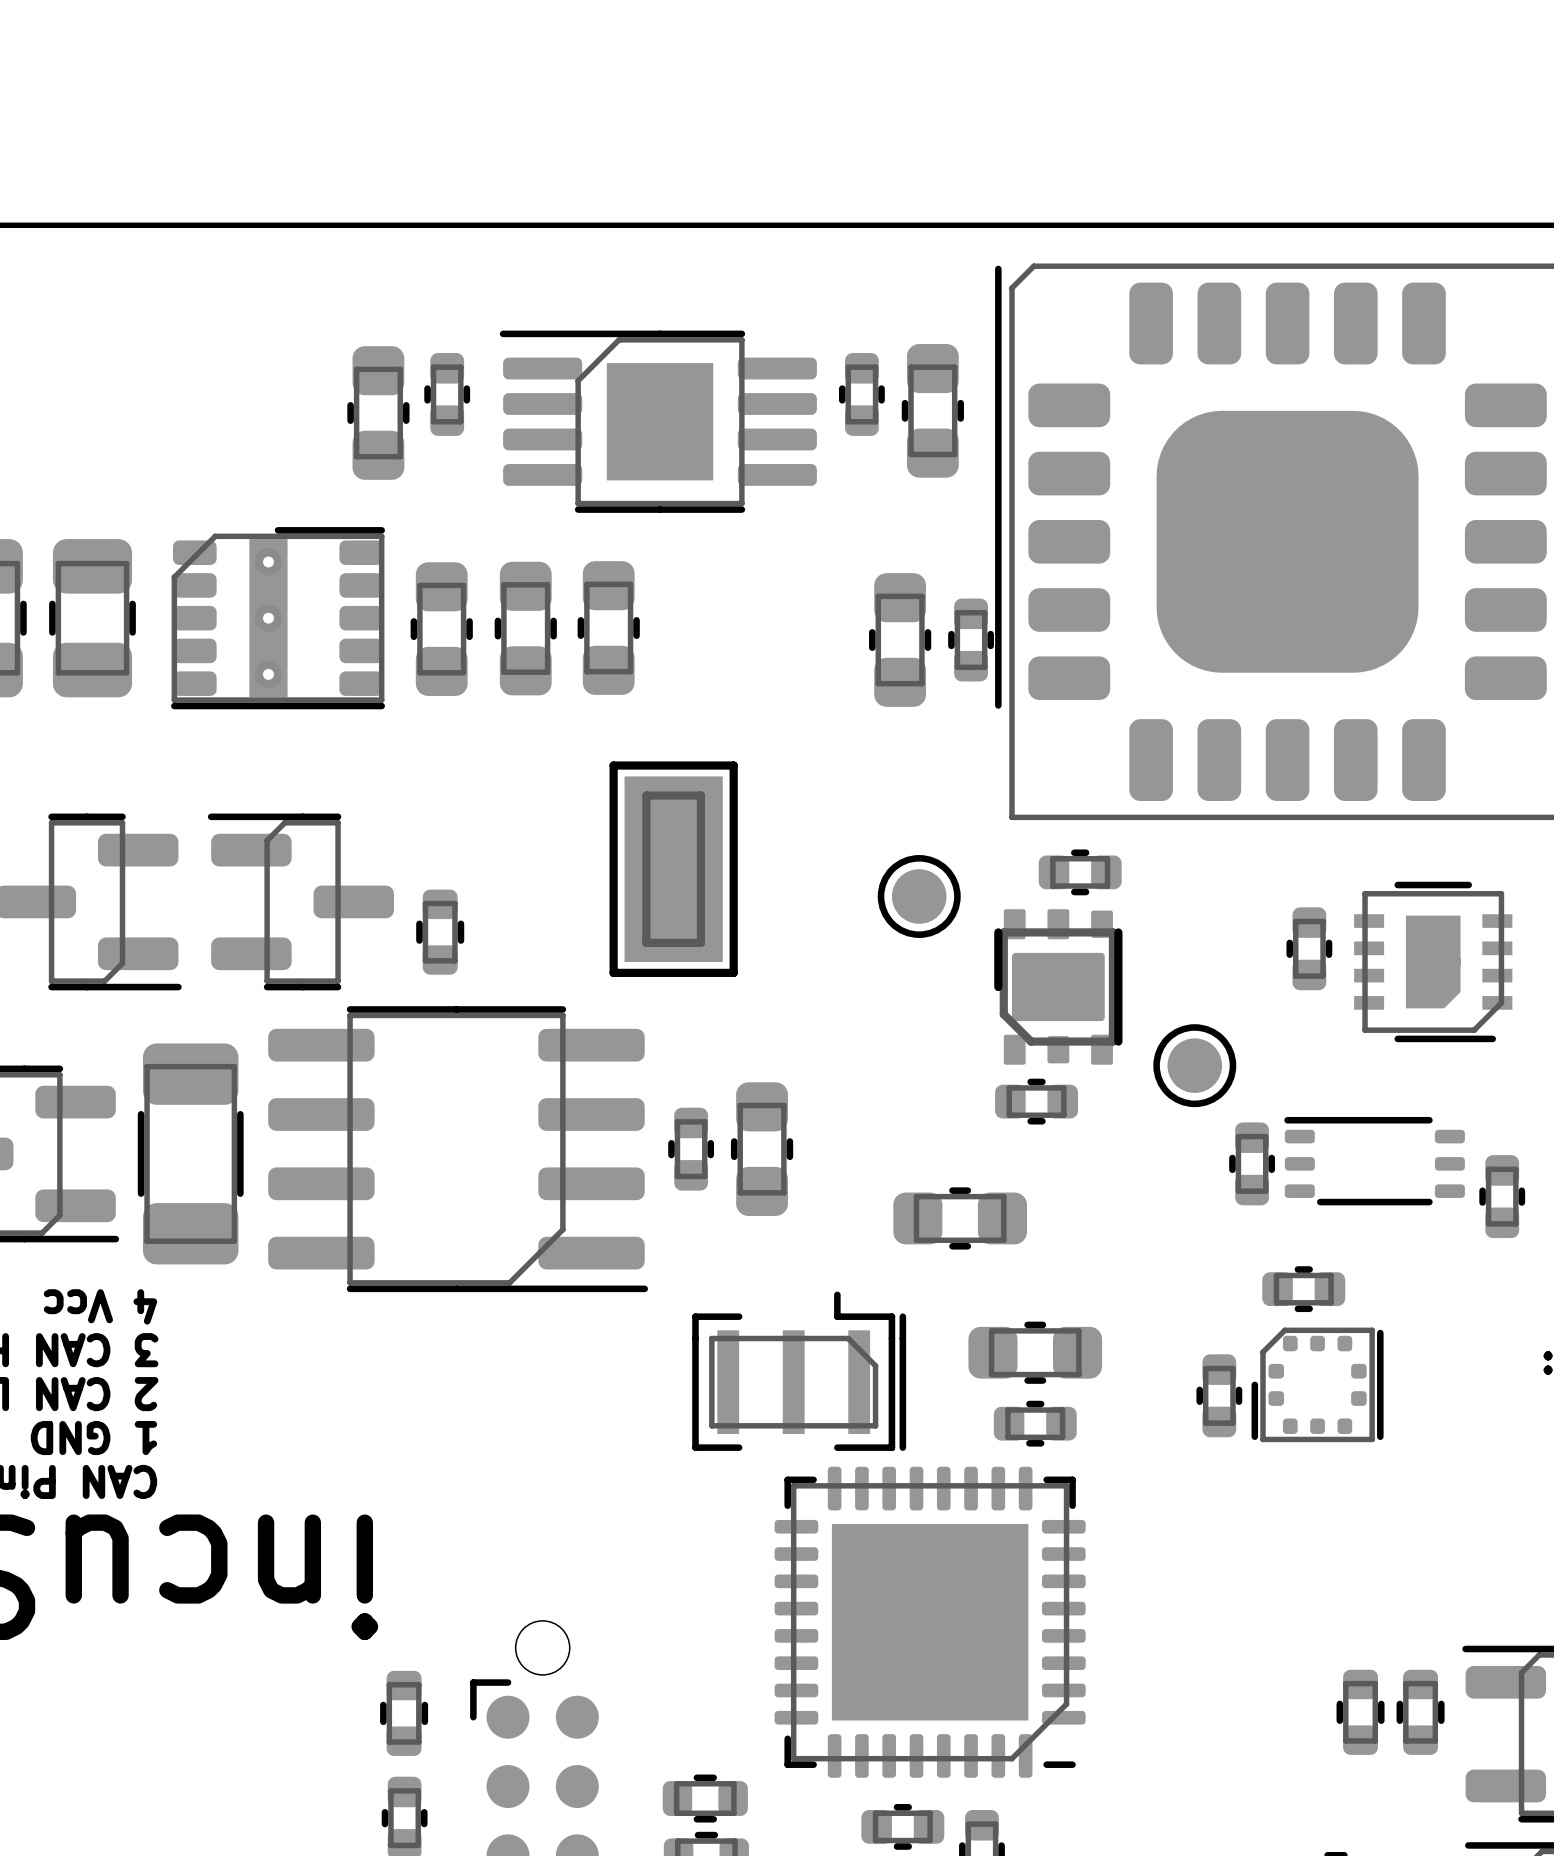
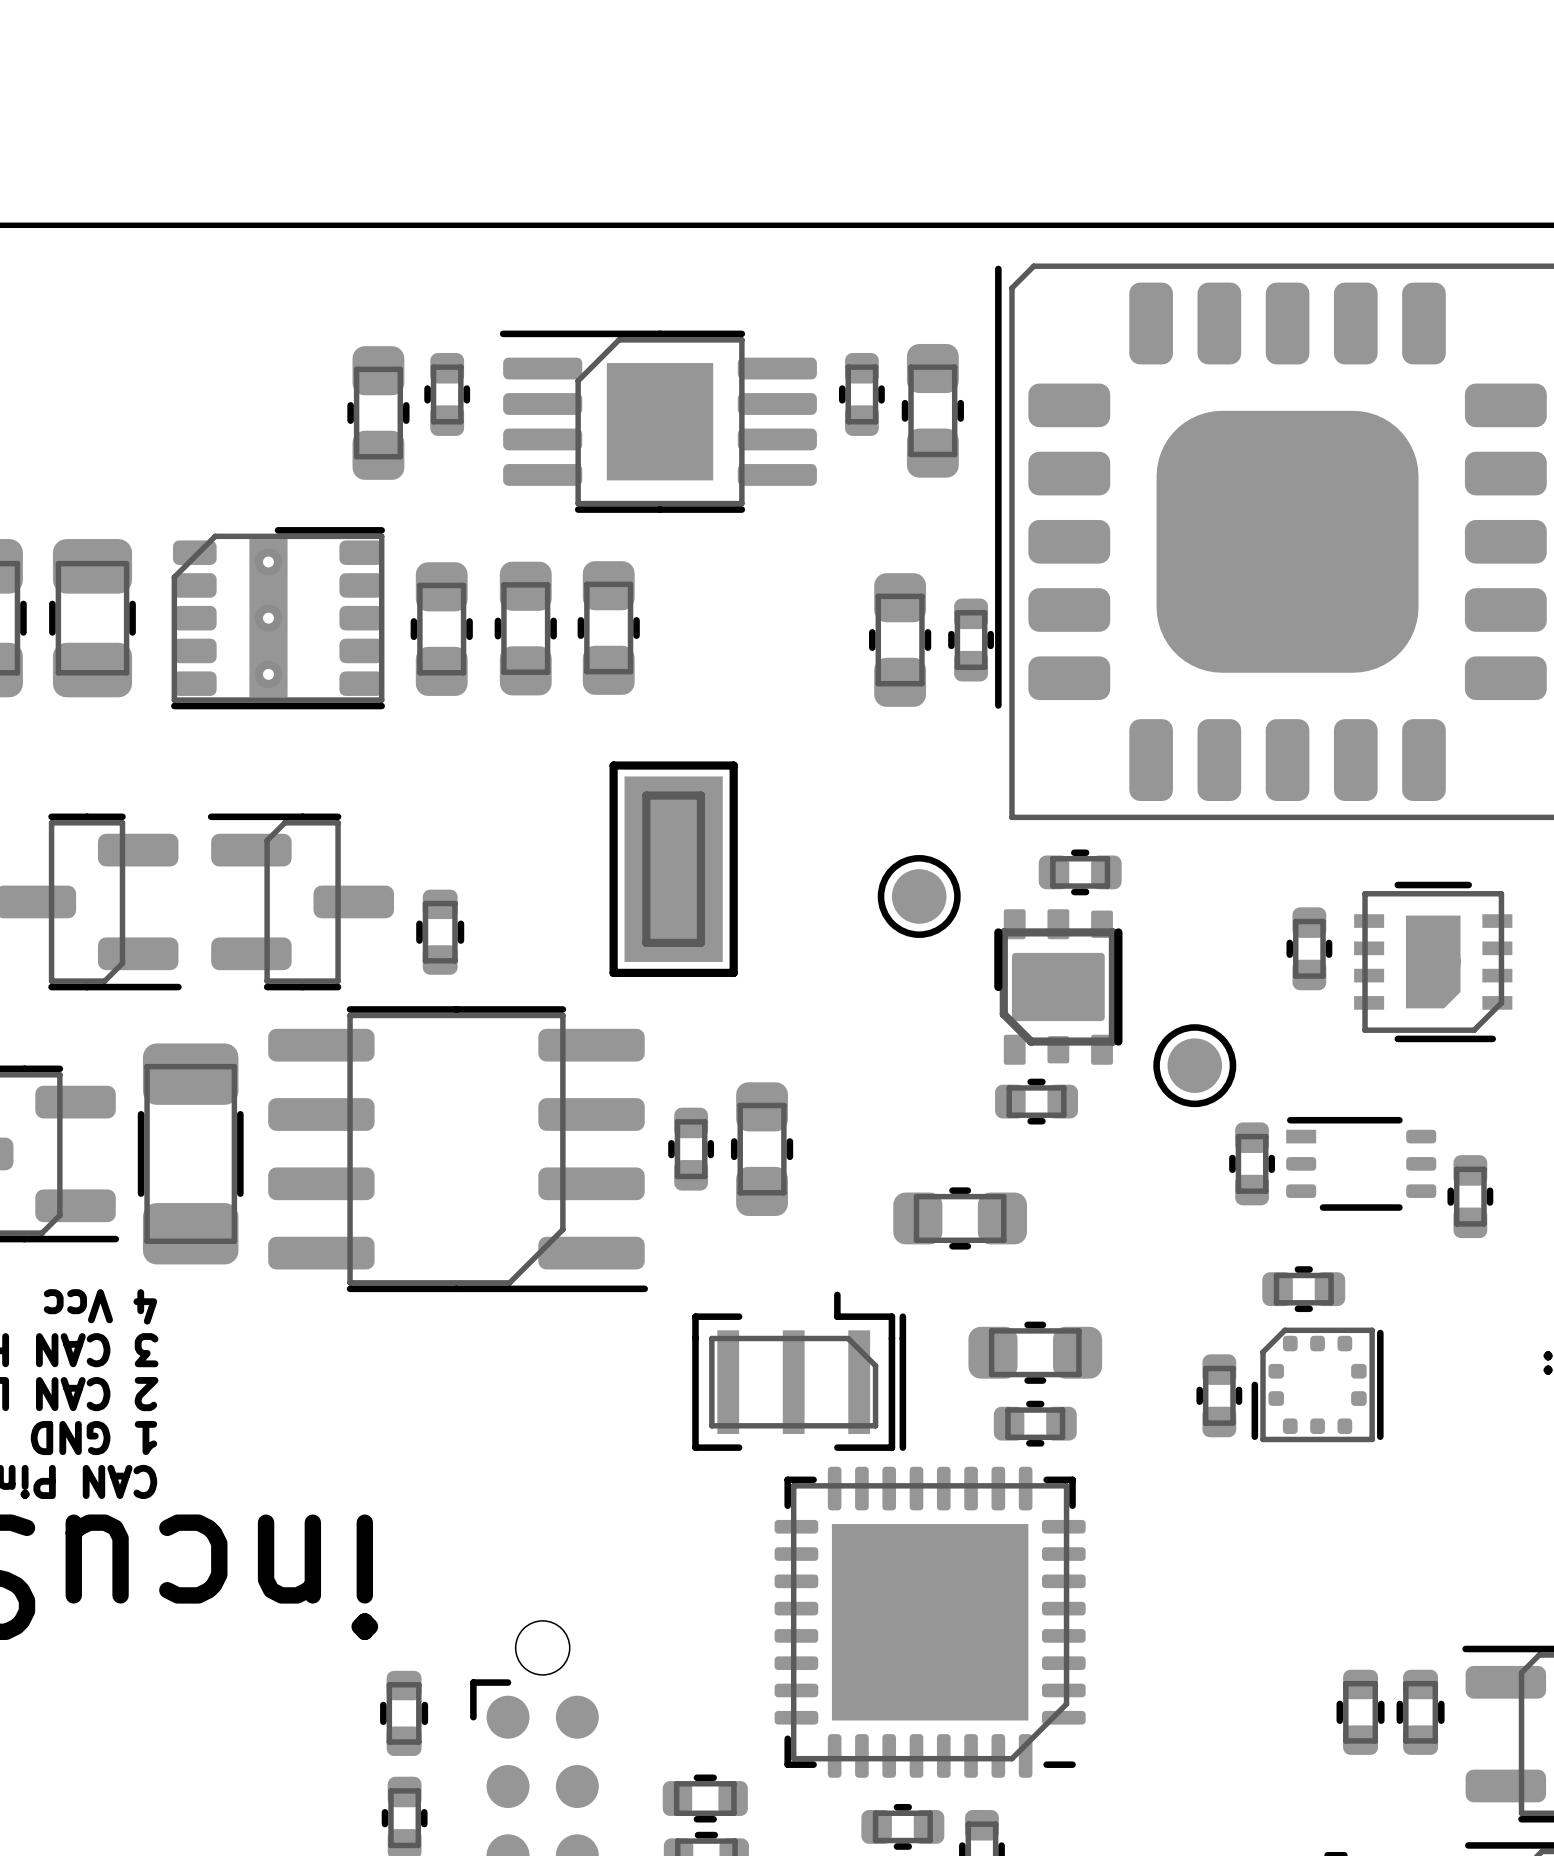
part footprint: [1284, 1116, 1465, 1206] -> [1286, 1116, 1437, 1211]
part position: (1502, 1196) -> (1470, 1196)

